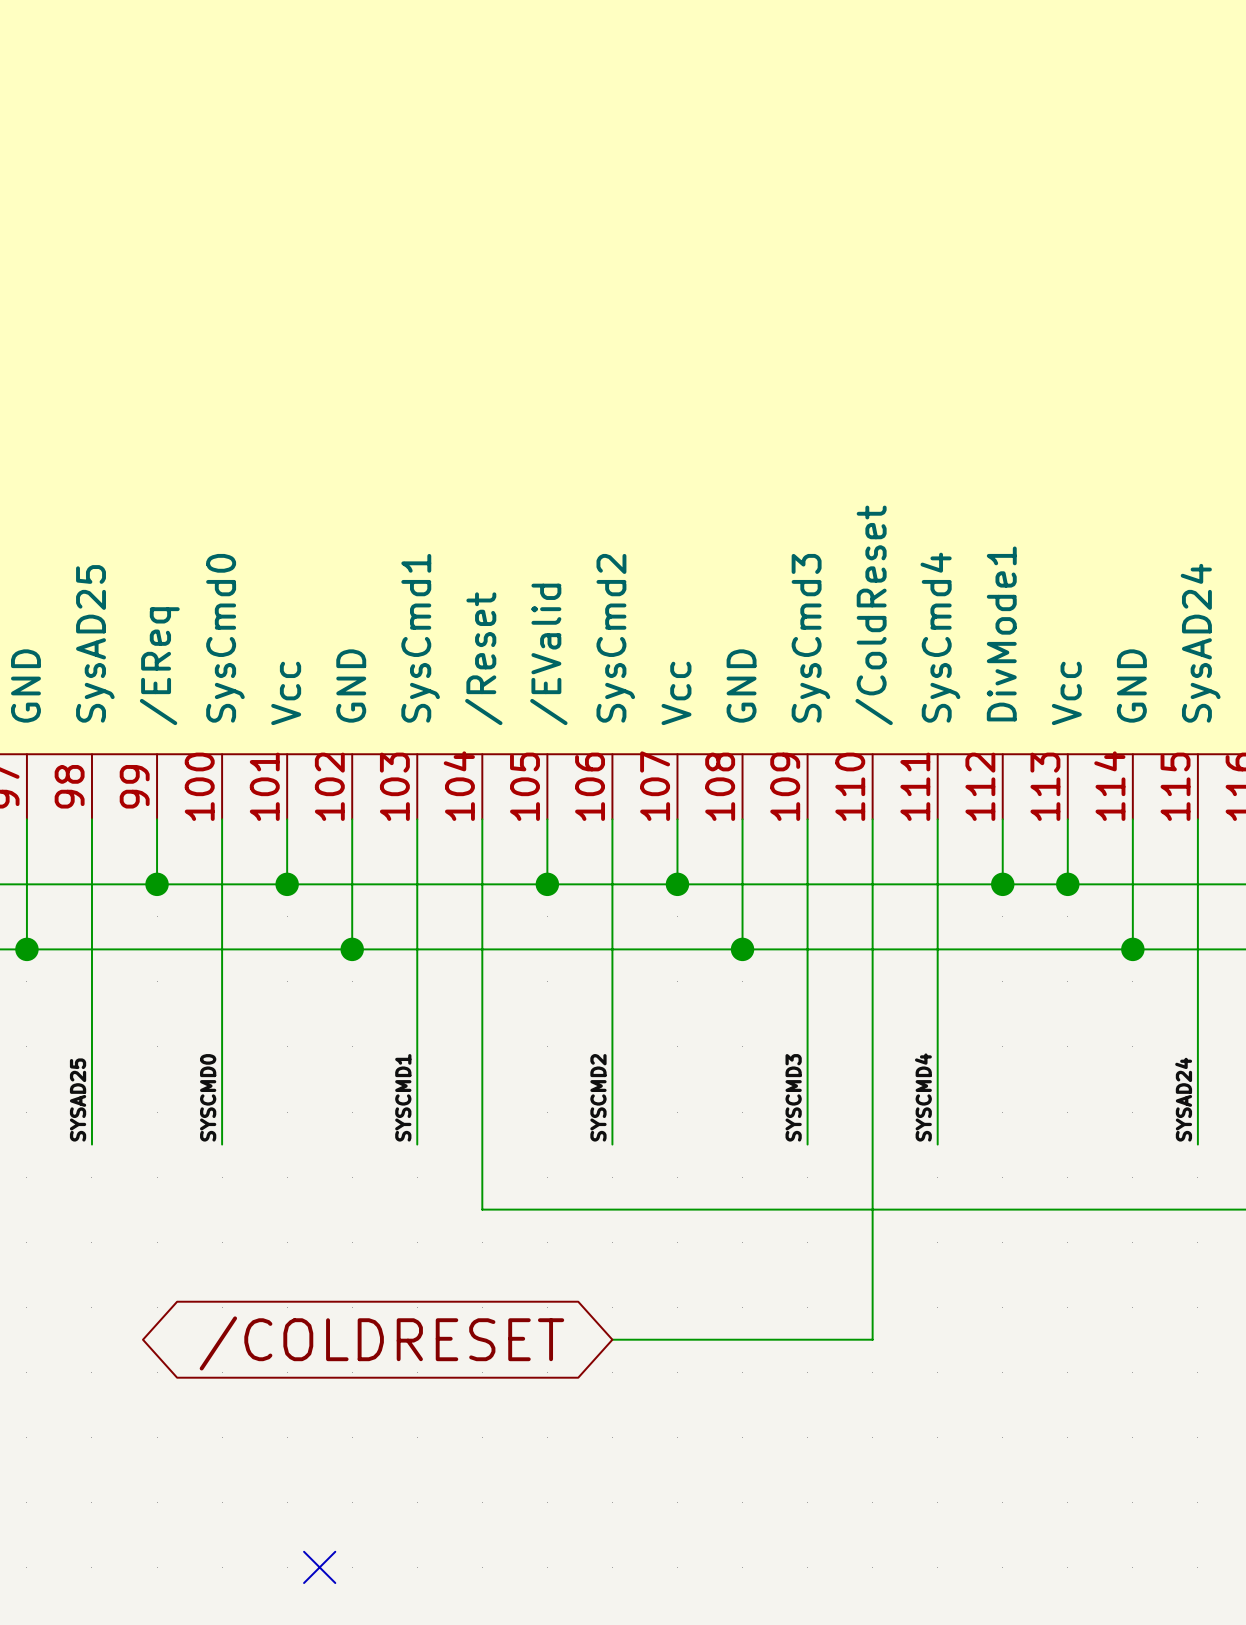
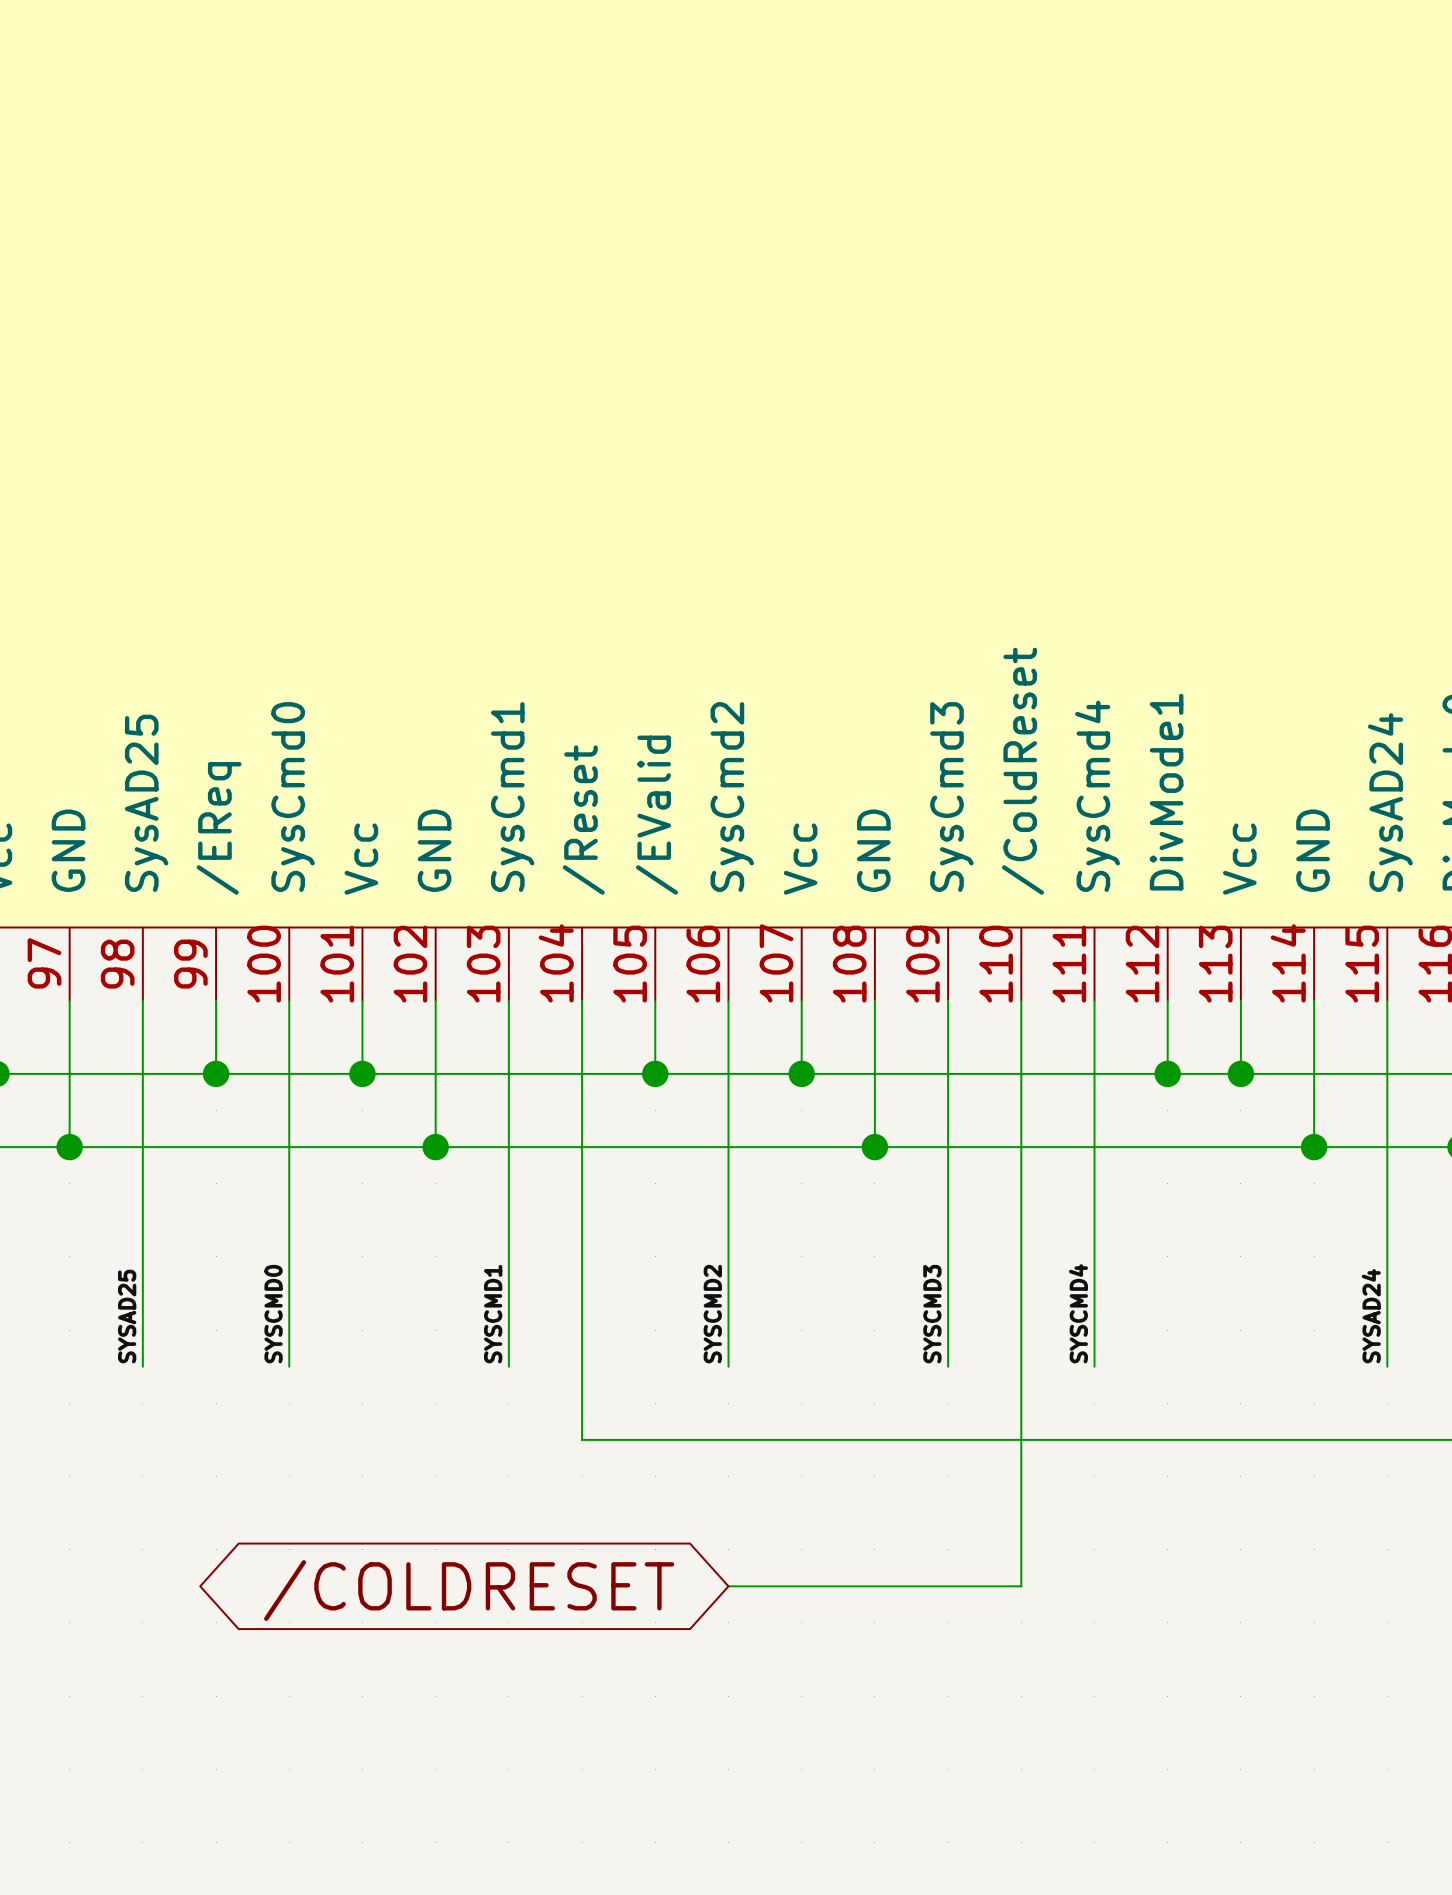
no-connect mark: (319, 1567) -> none

